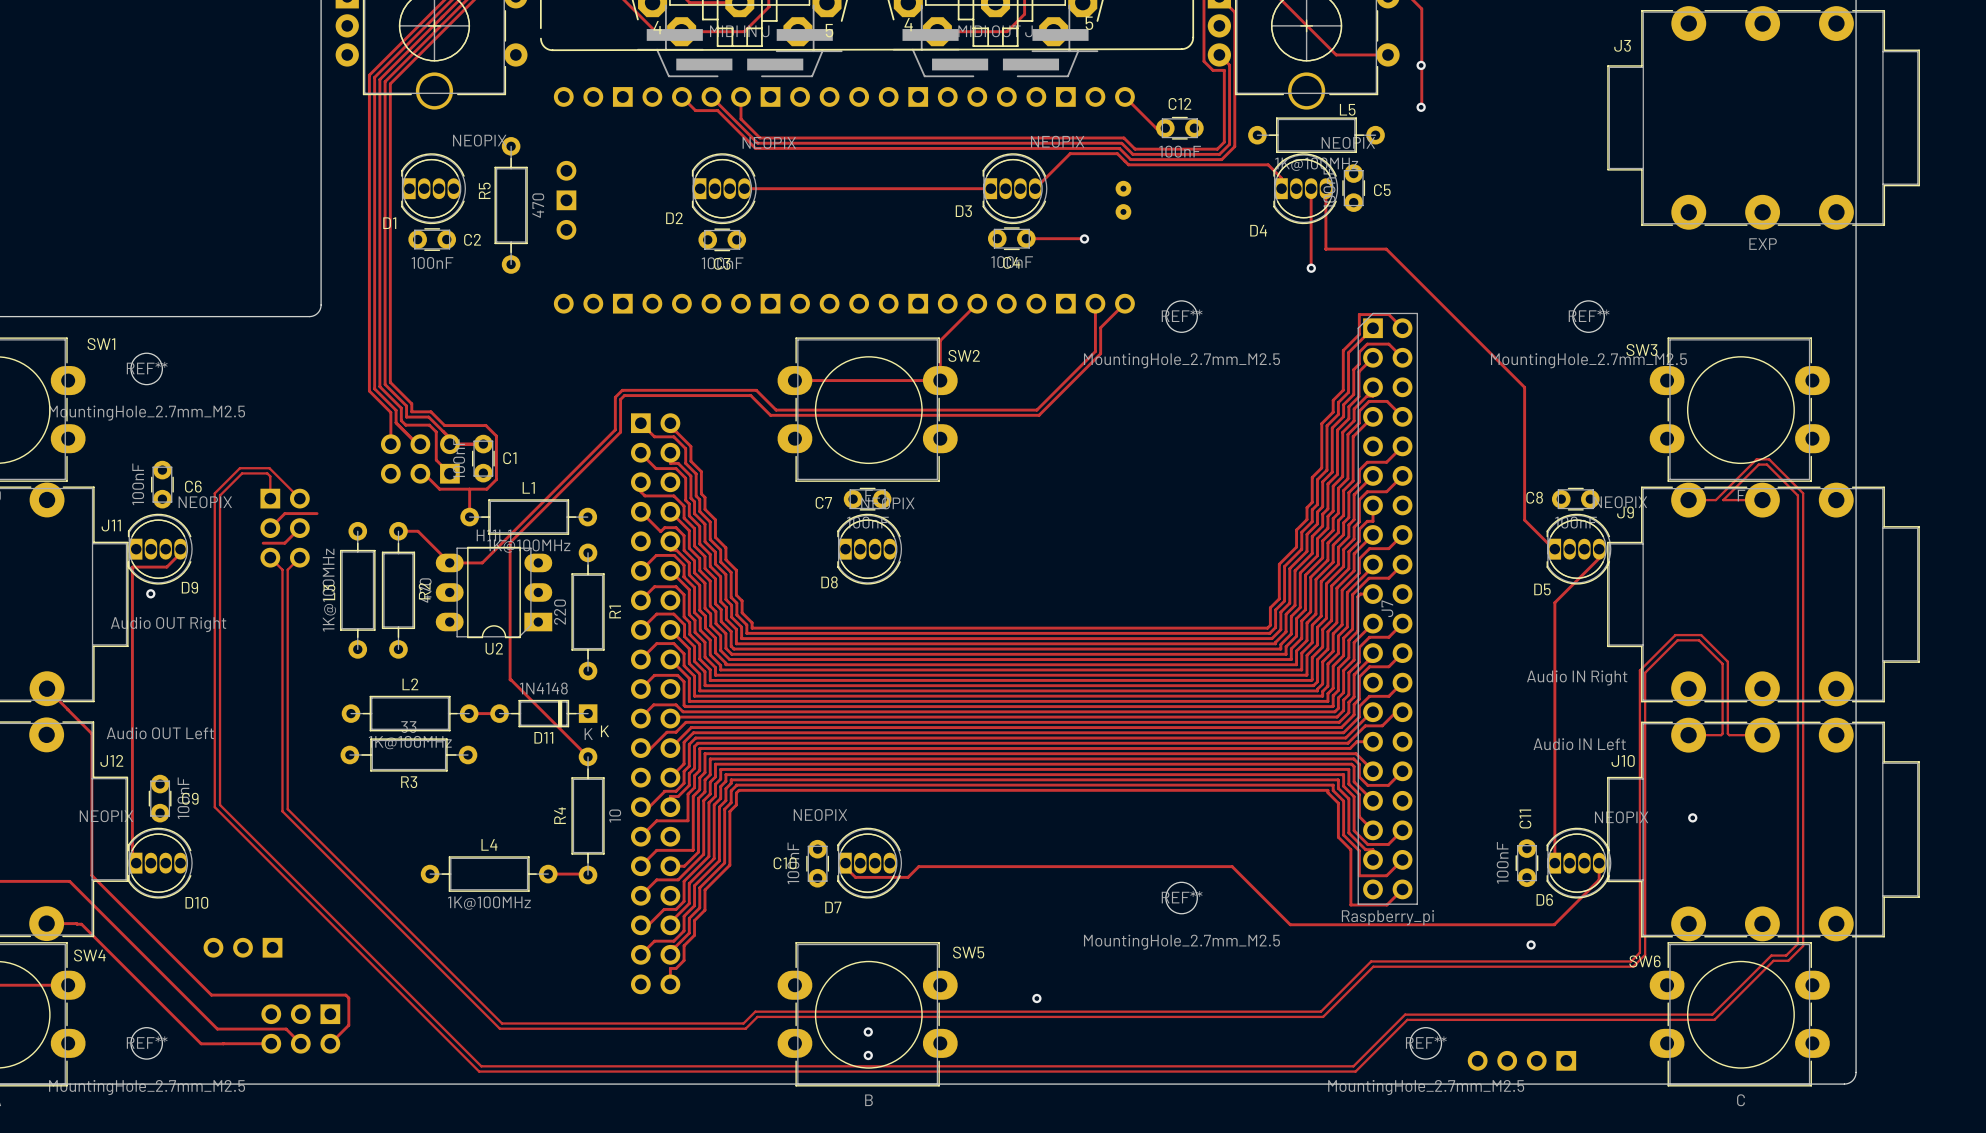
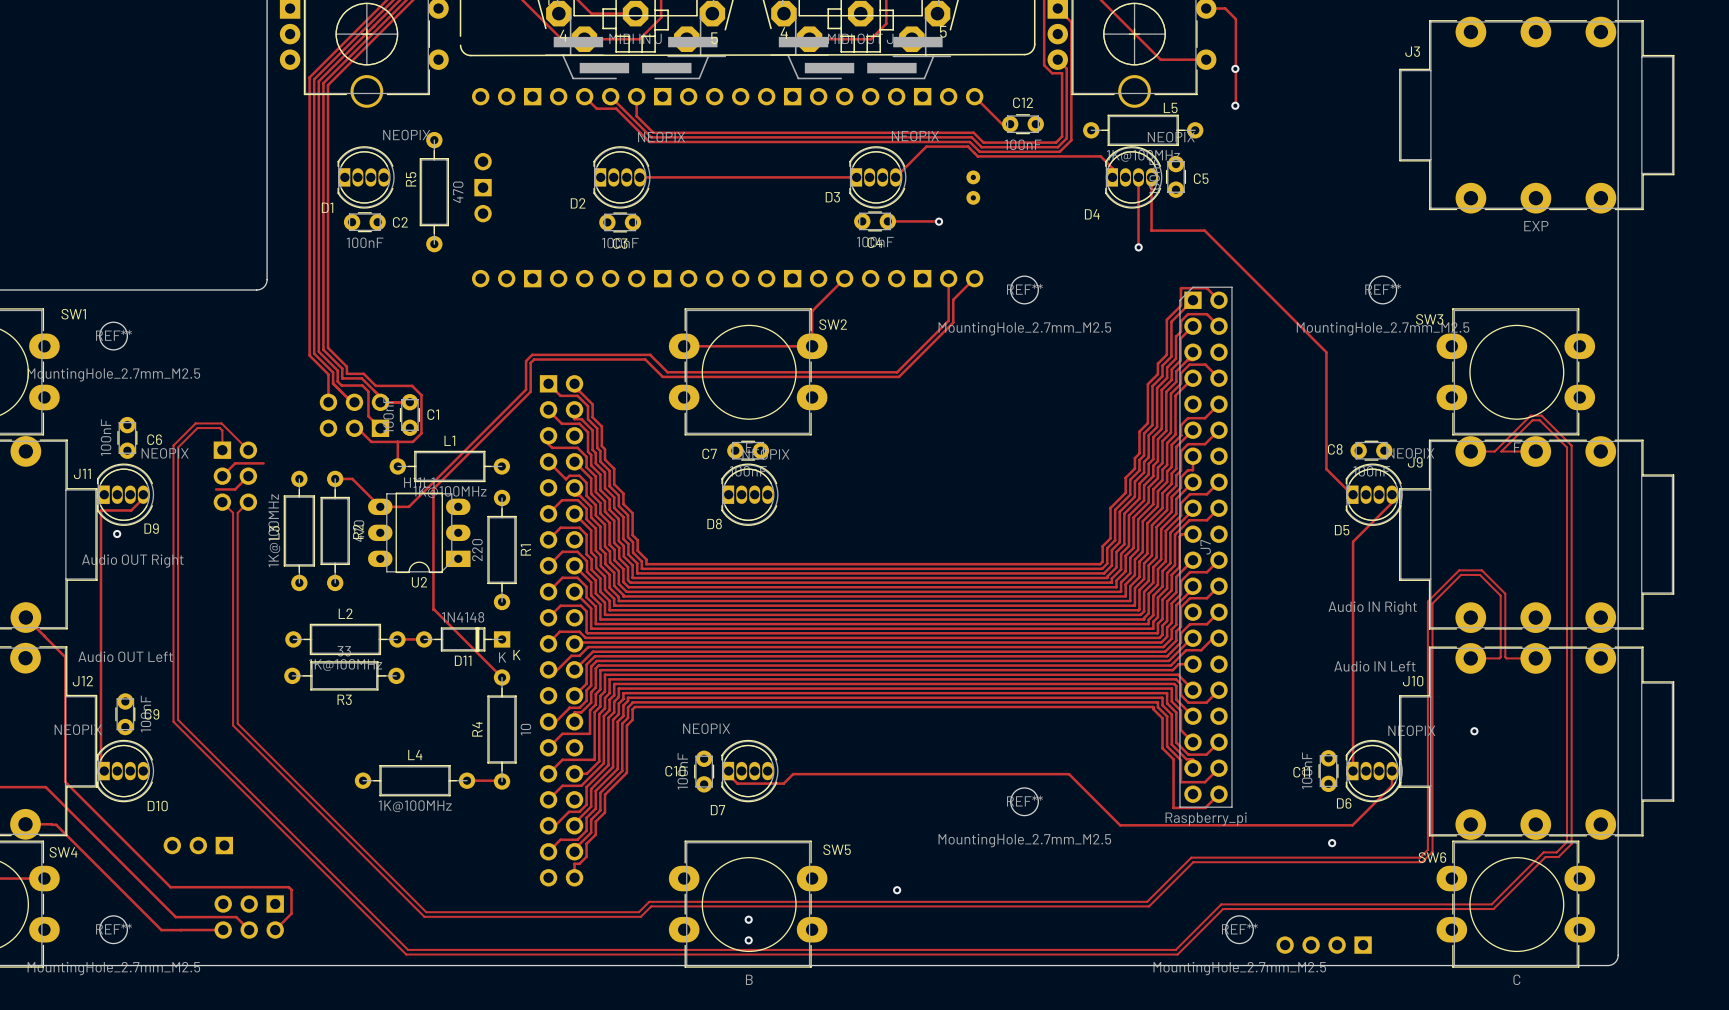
C11 name rotation: 0° (1525, 818) -> 90° clockwise (1301, 772)
C11 name position: C11 (1525, 818) -> C11 (1301, 772)

